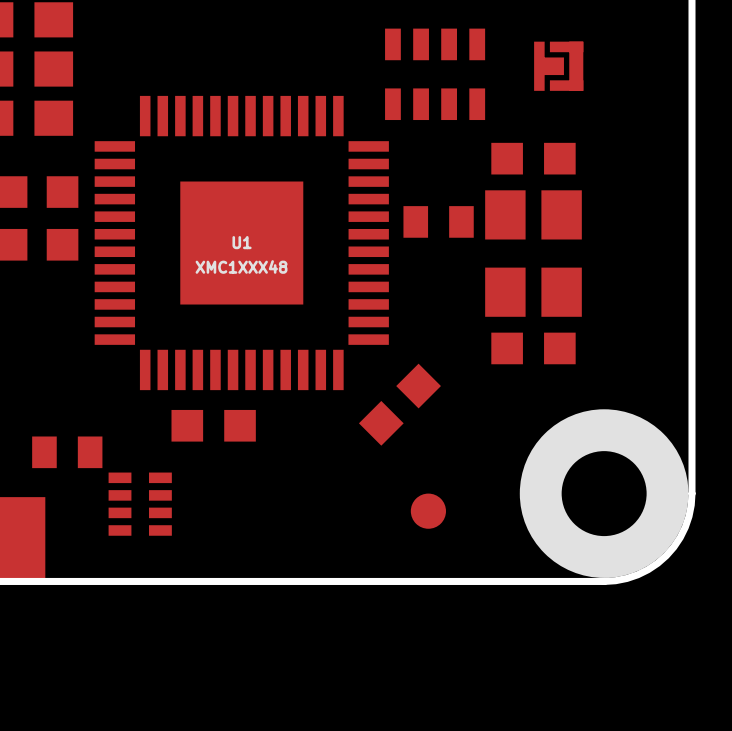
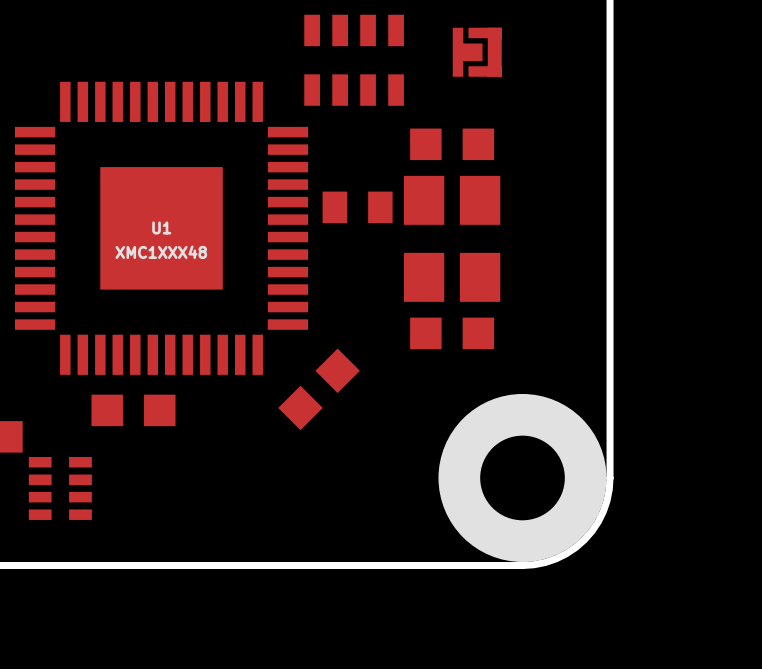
part: (428, 511) -> none

